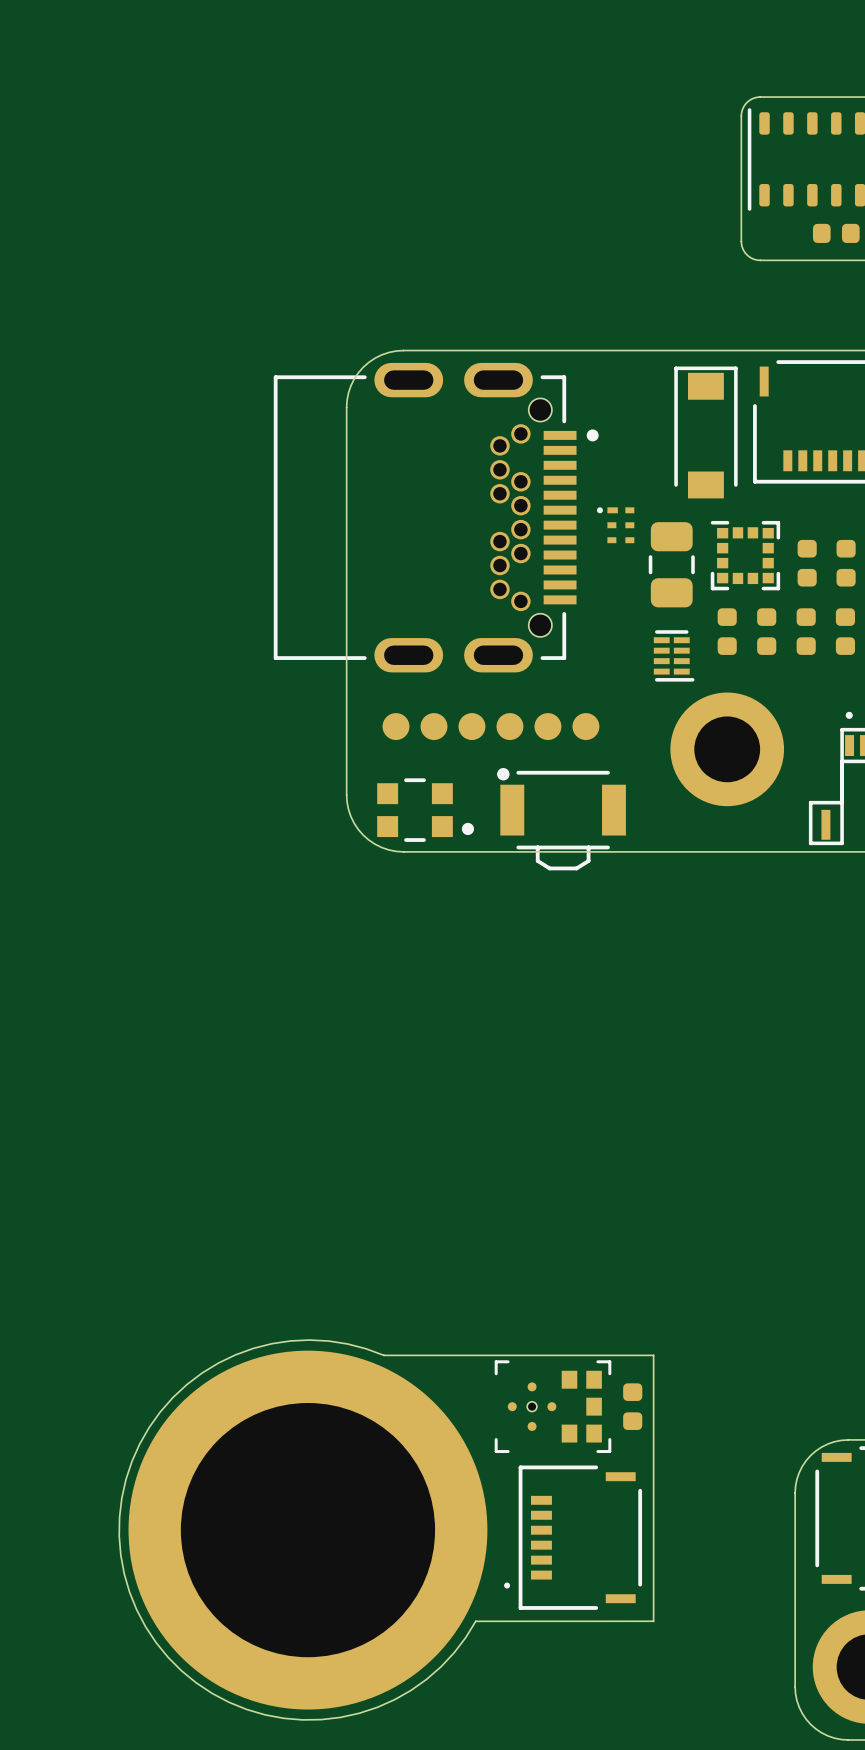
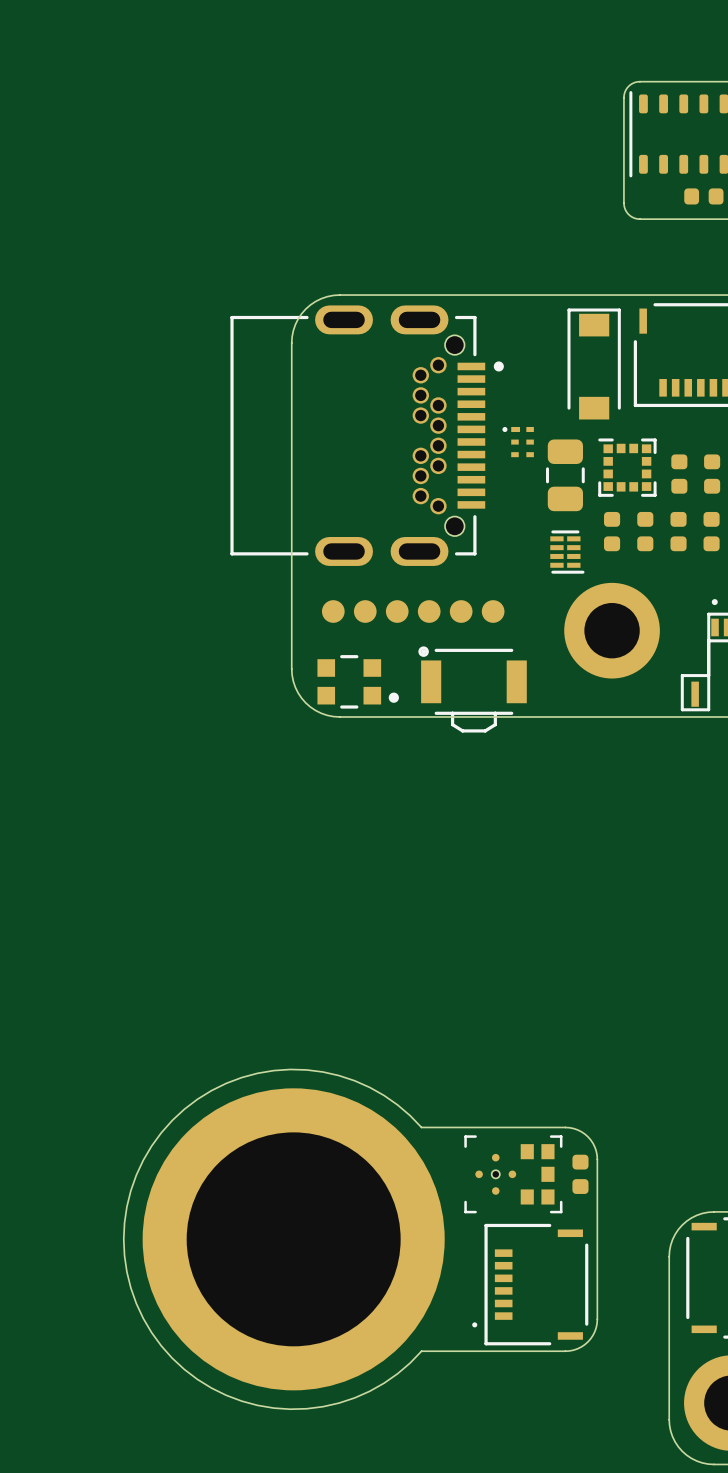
board edge: (383, 1355) (653, 1355) (653, 1621) (475, 1621) (454, 1652) (426, 1679) (411, 1690) (377, 1707) (340, 1717) (302, 1719) (283, 1718) (264, 1714) (228, 1702) (196, 1682) (168, 1657) (145, 1626) (129, 1592) (120, 1554) (119, 1516) (126, 1479) (139, 1443) (160, 1411) (186, 1384) (202, 1373) (235, 1354) (271, 1343) (309, 1340) (347, 1343) (383, 1355) -> (565, 1127) (577, 1129) (587, 1136) (594, 1147) (597, 1159) (597, 1323) (590, 1338) (577, 1348) (565, 1351) (421, 1351) (397, 1373) (369, 1391) (354, 1397) (339, 1403) (306, 1408) (273, 1408) (257, 1405) (226, 1395) (211, 1388) (184, 1369) (172, 1358) (151, 1332) (136, 1303) (126, 1272) (123, 1239) (126, 1206) (136, 1175) (151, 1146) (172, 1120) (197, 1099) (226, 1083) (241, 1077) (273, 1070) (306, 1069) (323, 1071) (339, 1075) (369, 1087) (397, 1104) (421, 1127) (565, 1127)
part footprint: [623, 1383, 643, 1430] -> [464, 1135, 563, 1214]
part: none -> (580, 1174)
part: (553, 1406) -> none
part position: (307, 1530) -> (293, 1239)
part position: (573, 1537) -> (530, 1284)

